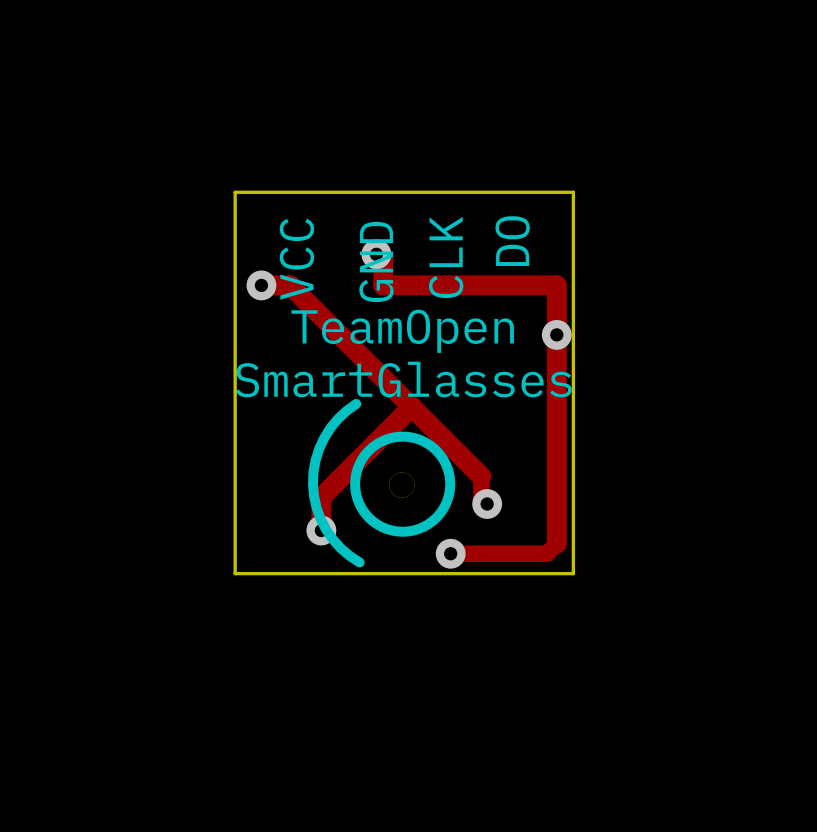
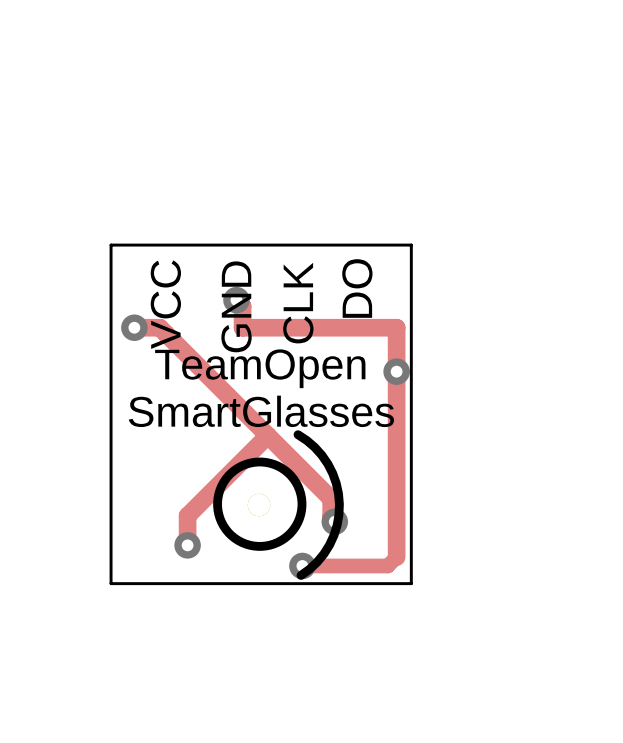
drawing shape: [308, 398, 456, 568] -> [213, 430, 344, 580]

